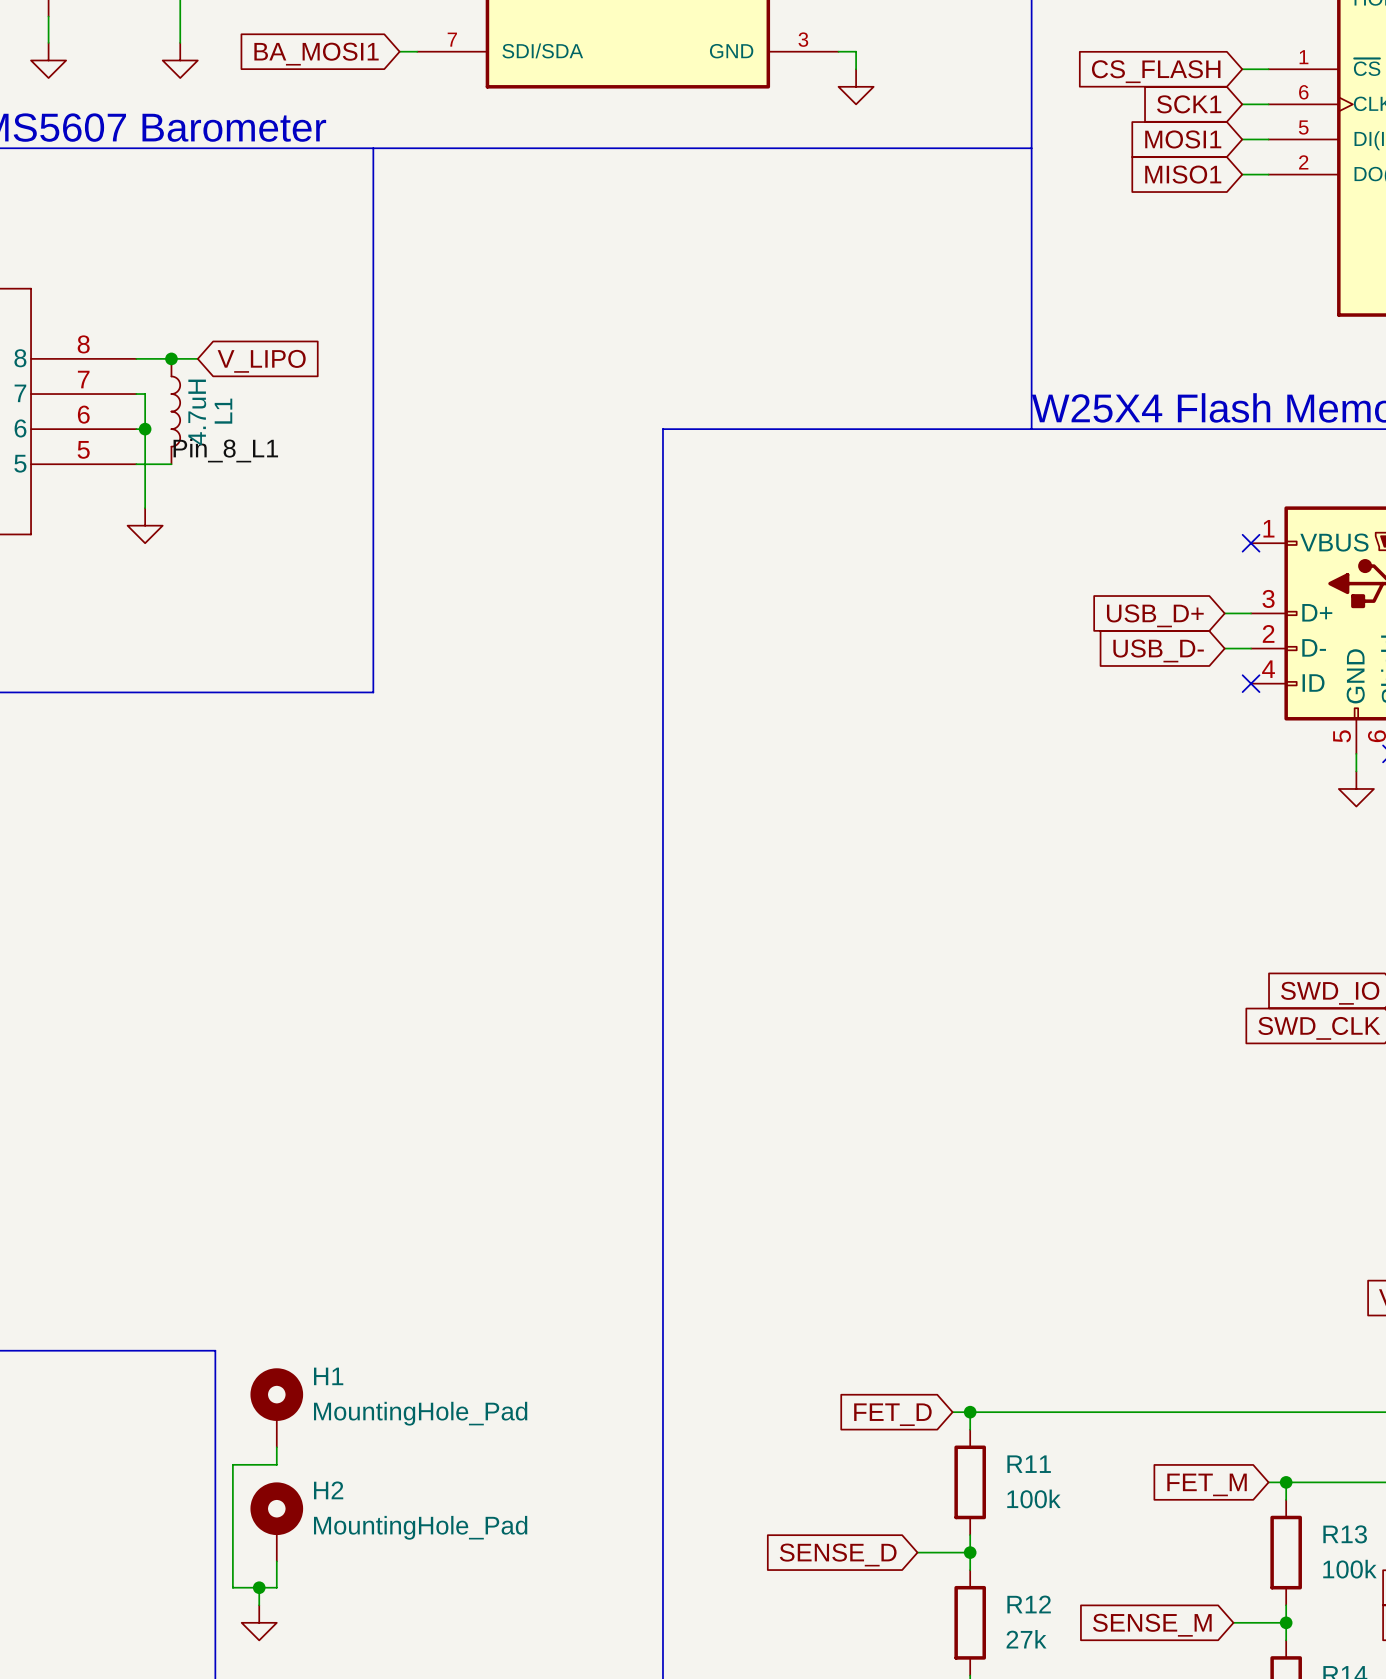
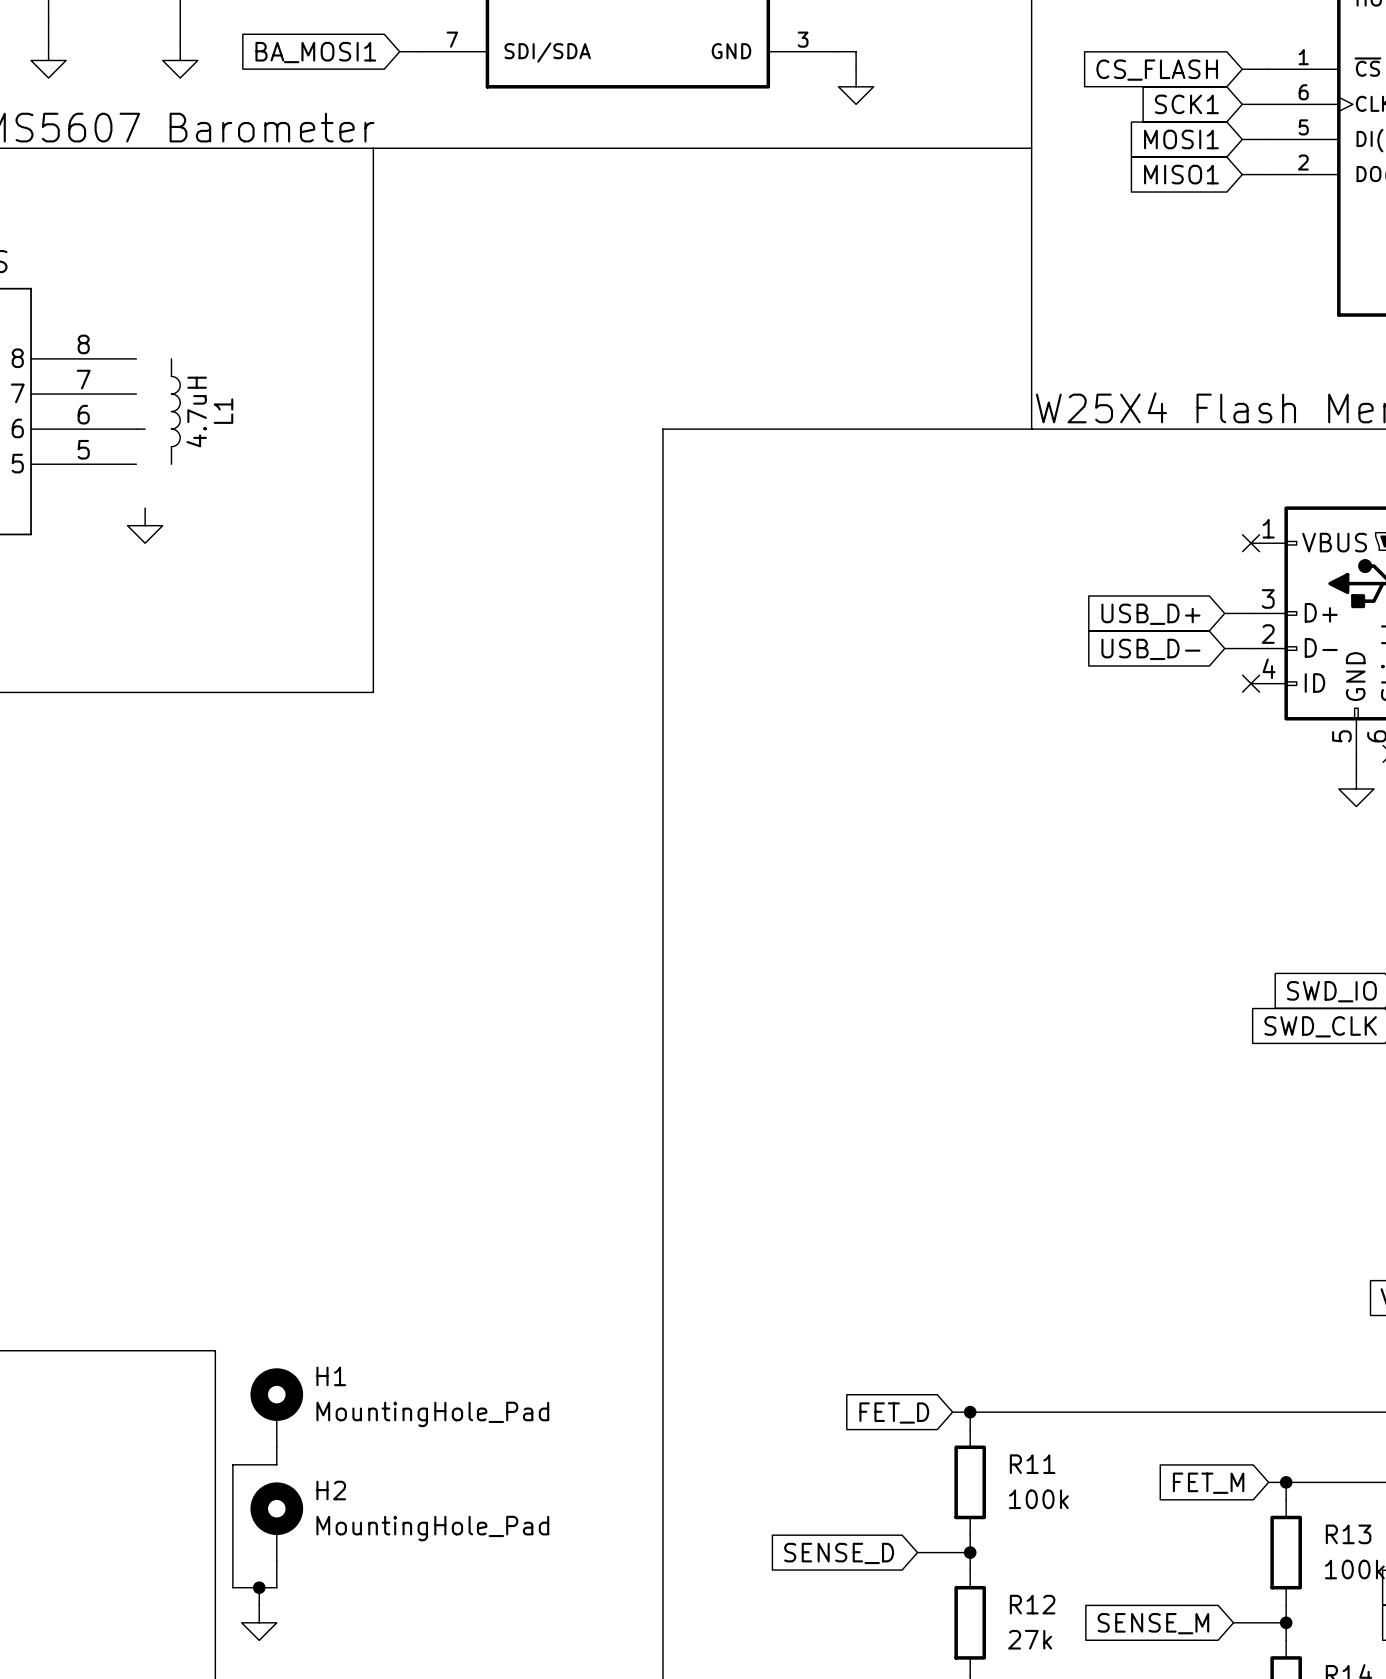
wire: (136, 358) (197, 358) -> none
junction: (171, 358) -> none
global label: V_LIPO (261, 361) -> none
wire: (136, 394) (145, 394) (145, 508) -> none
junction: (145, 429) -> none
label: Pin_8_L1 (225, 450) -> none
wire: (136, 464) (171, 464) -> none

